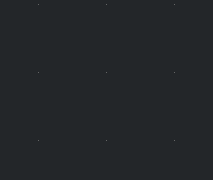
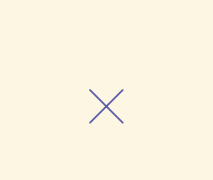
no-connect mark: none -> (106, 106)

